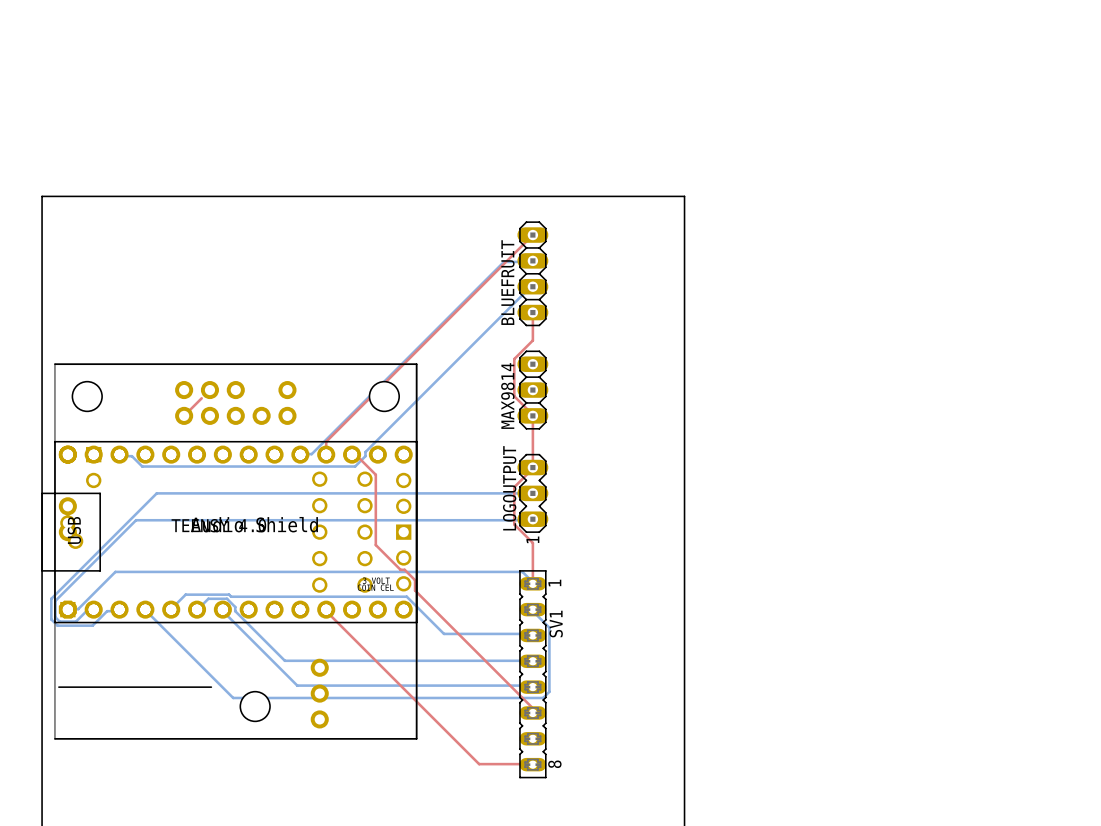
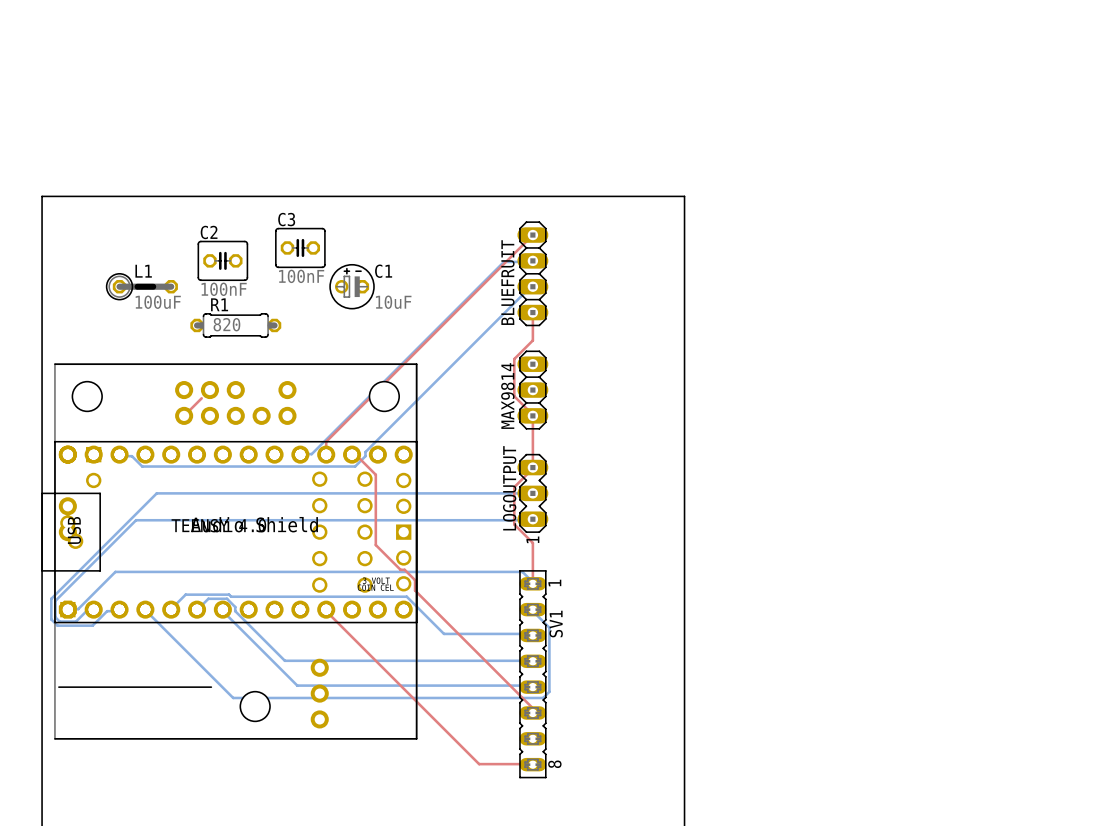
C3: none -> 100nF (300, 247)
C2: none -> 100nF (222, 260)
L1: none -> 100uF (142, 286)
C1: none -> 10uF (352, 286)
R1: none -> 820 (235, 325)

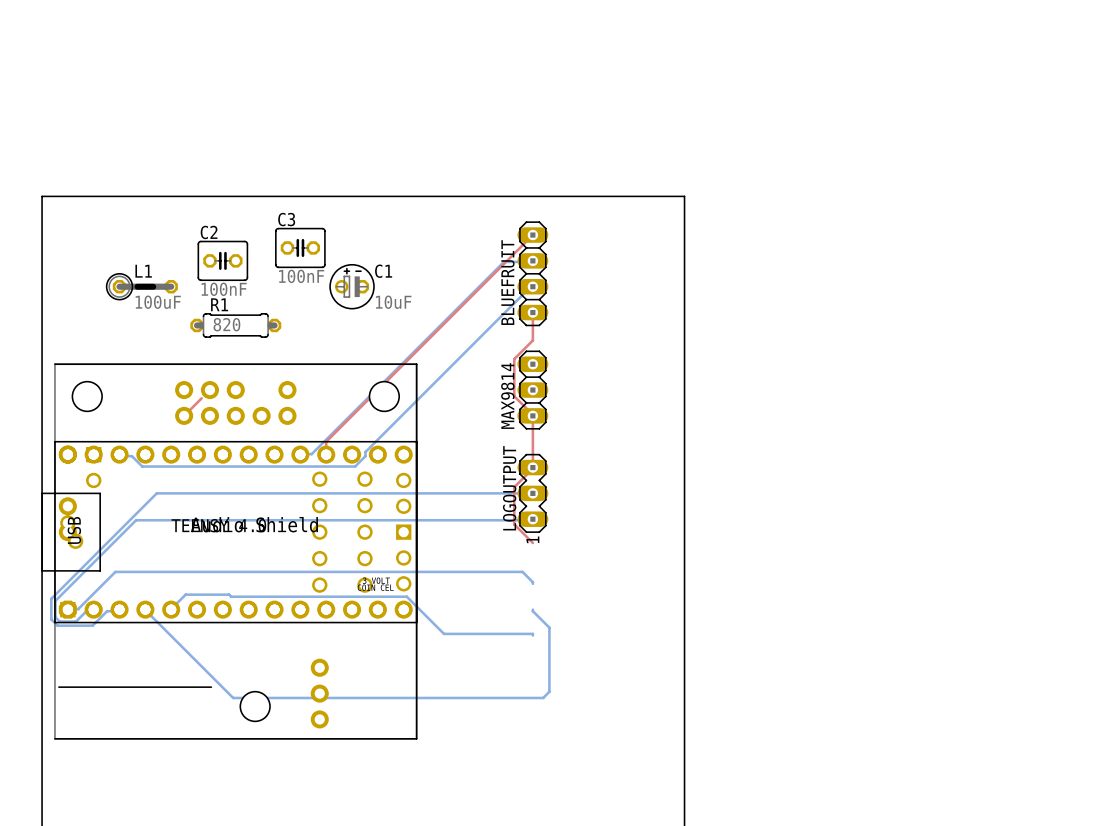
top track: (352, 454) (357, 456) (375, 474) (375, 545) (400, 569) (404, 569) (415, 580) (415, 590) (532, 708) (532, 712) -> none
top track: (532, 542) (532, 583) -> none
bottom track: (197, 609) (208, 598) (227, 598) (235, 607) (235, 611) (284, 660) (532, 661) -> none
bottom track: (222, 609) (297, 685) (532, 685) (532, 687) -> none
top track: (326, 609) (479, 764) (532, 764) -> none
SV1: (532, 674) -> none

